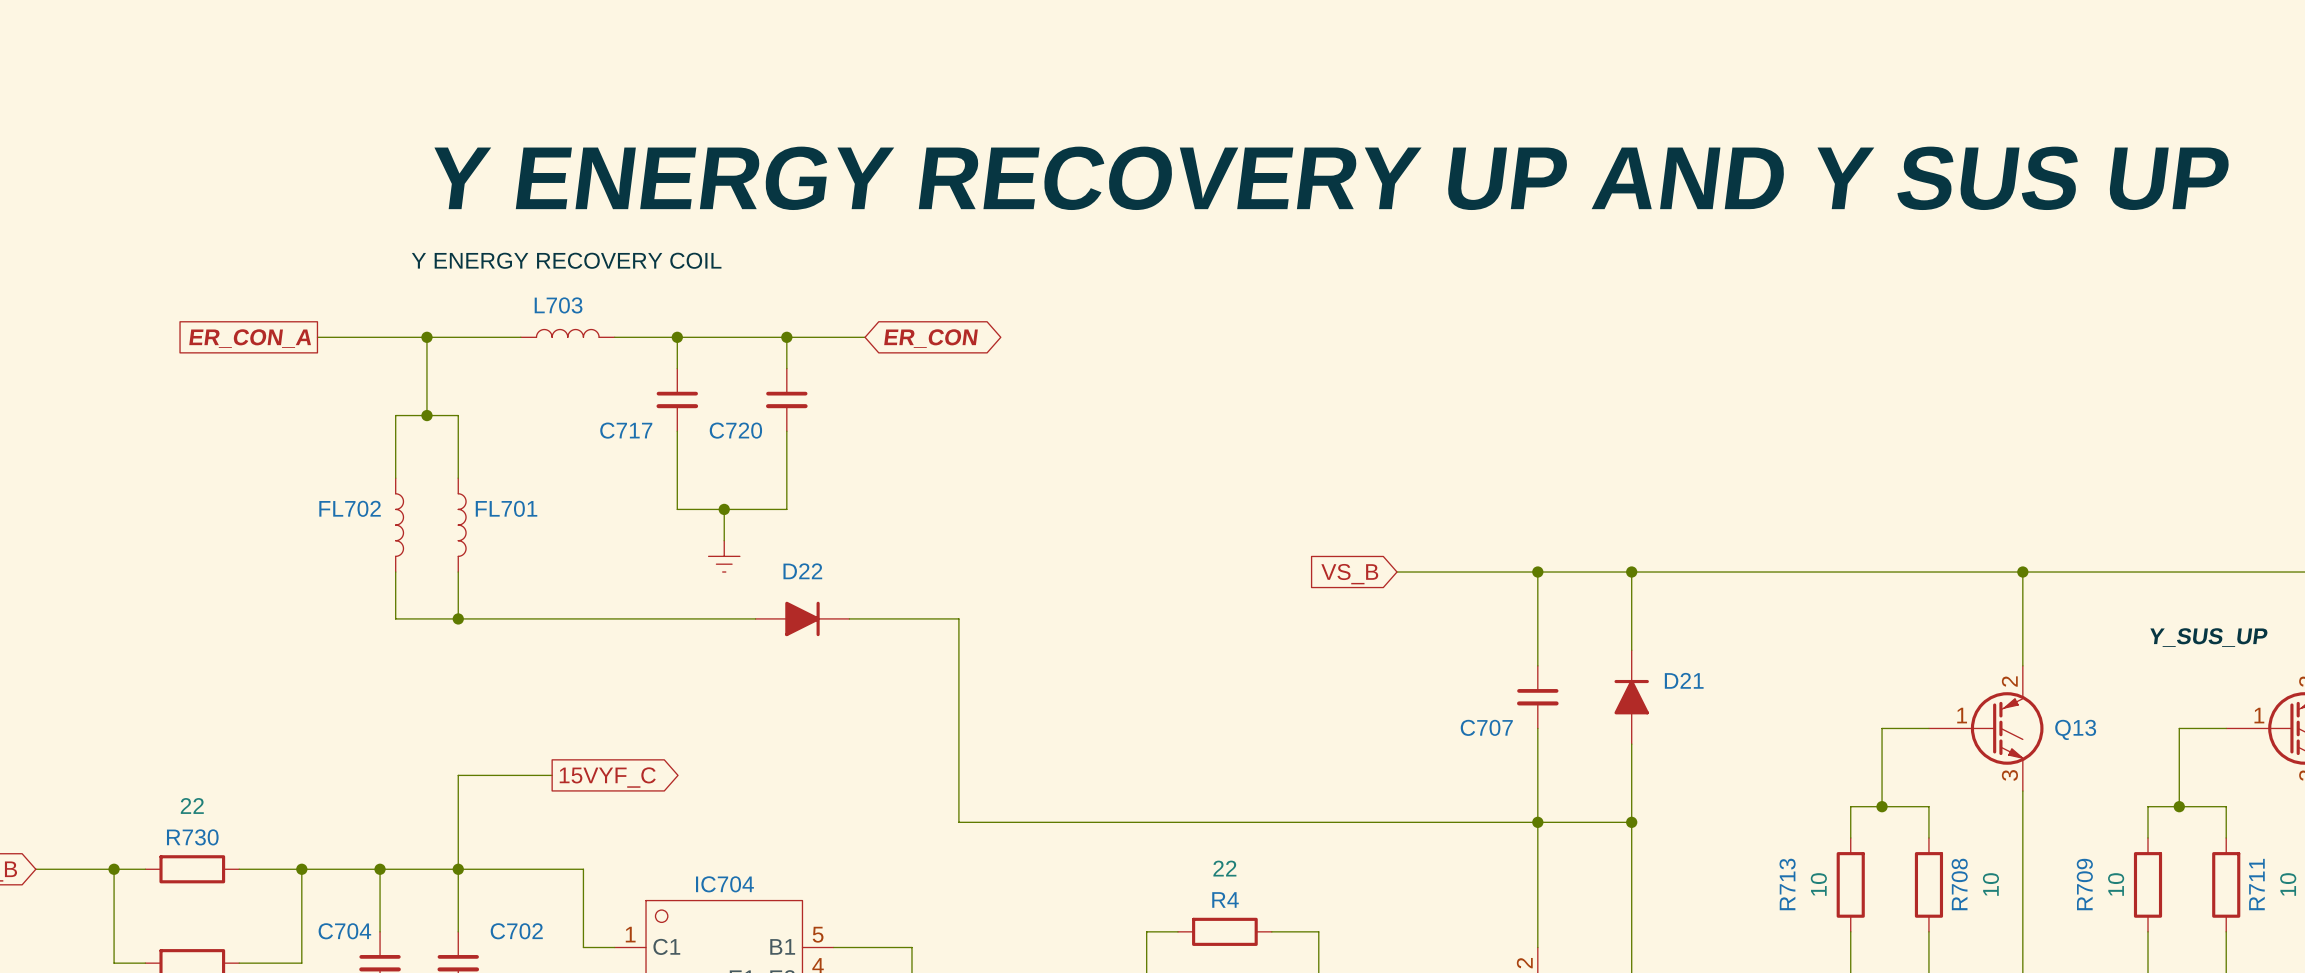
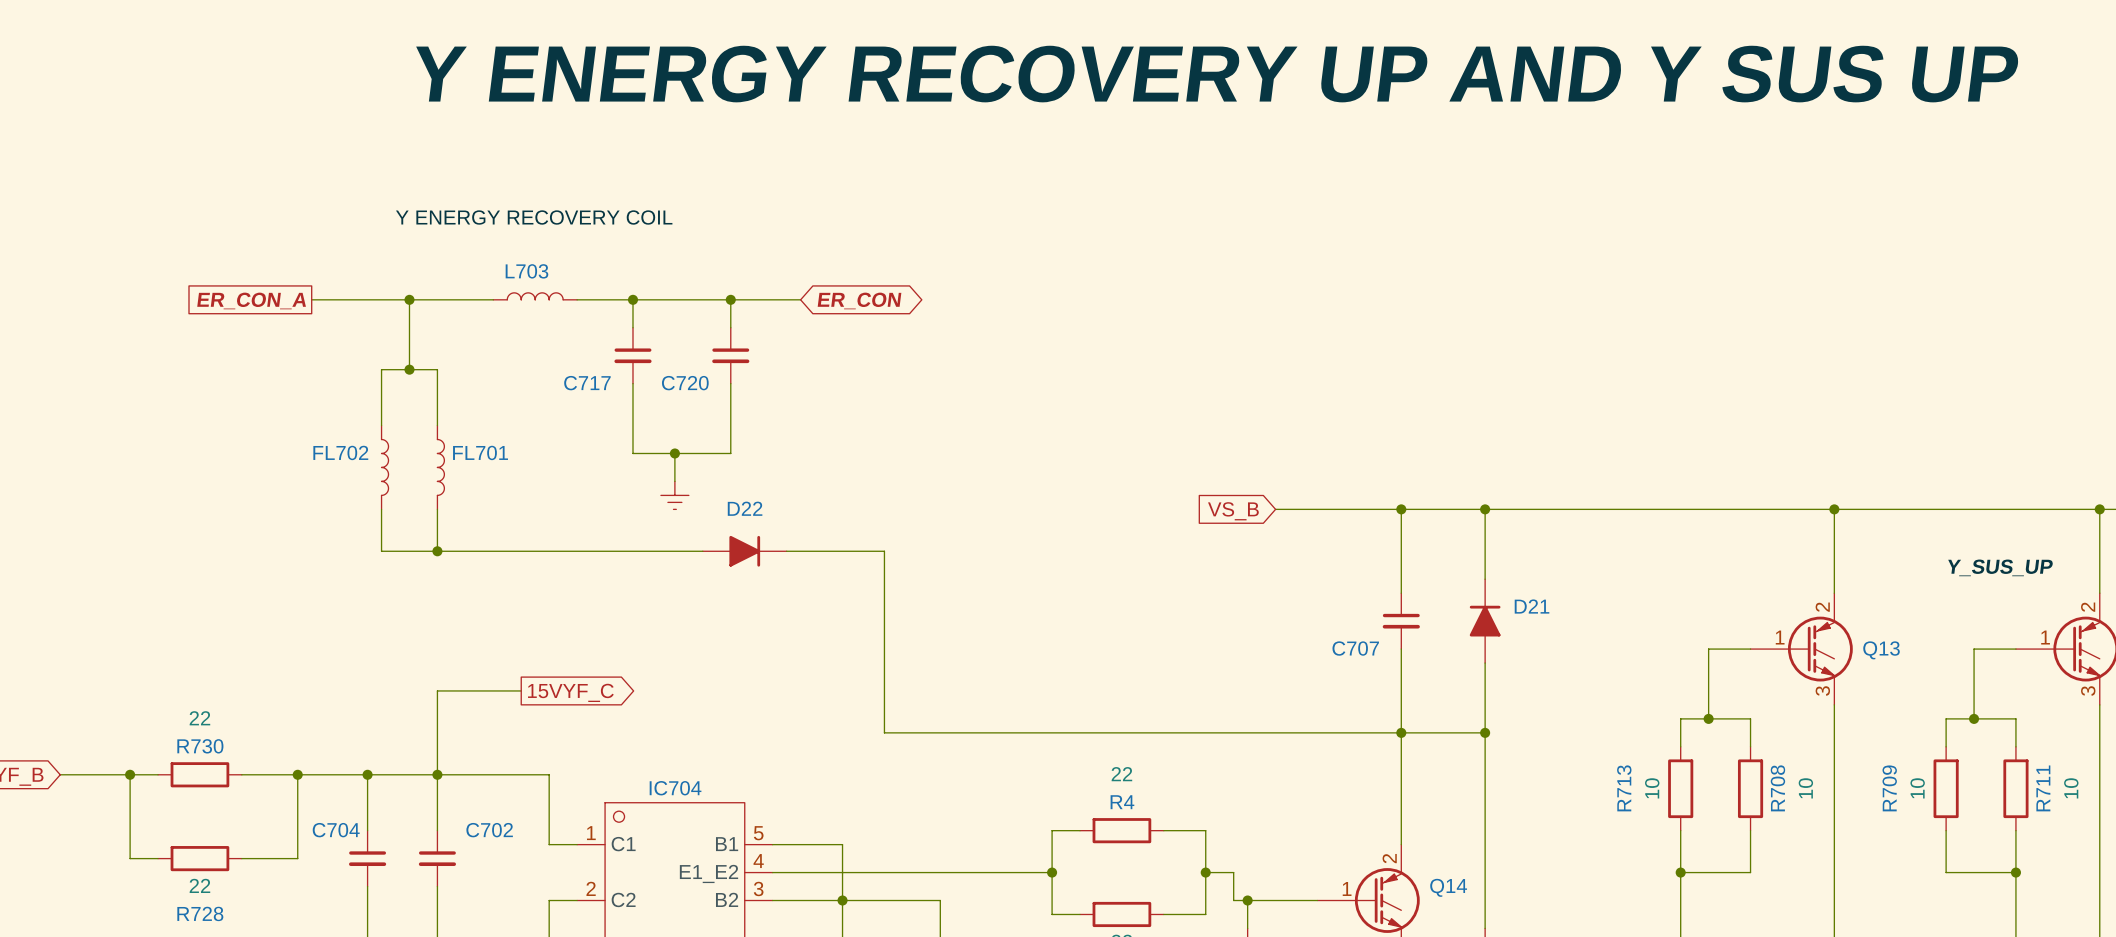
label position: Y ENERGY RECOVERY UP AND Y SUS UP (1332, 178) -> Y ENERGY RECOVERY UP AND Y SUS UP (1217, 74)
label position: Y ENERGY RECOVERY COIL (566, 260) -> Y ENERGY RECOVERY COIL (534, 217)

